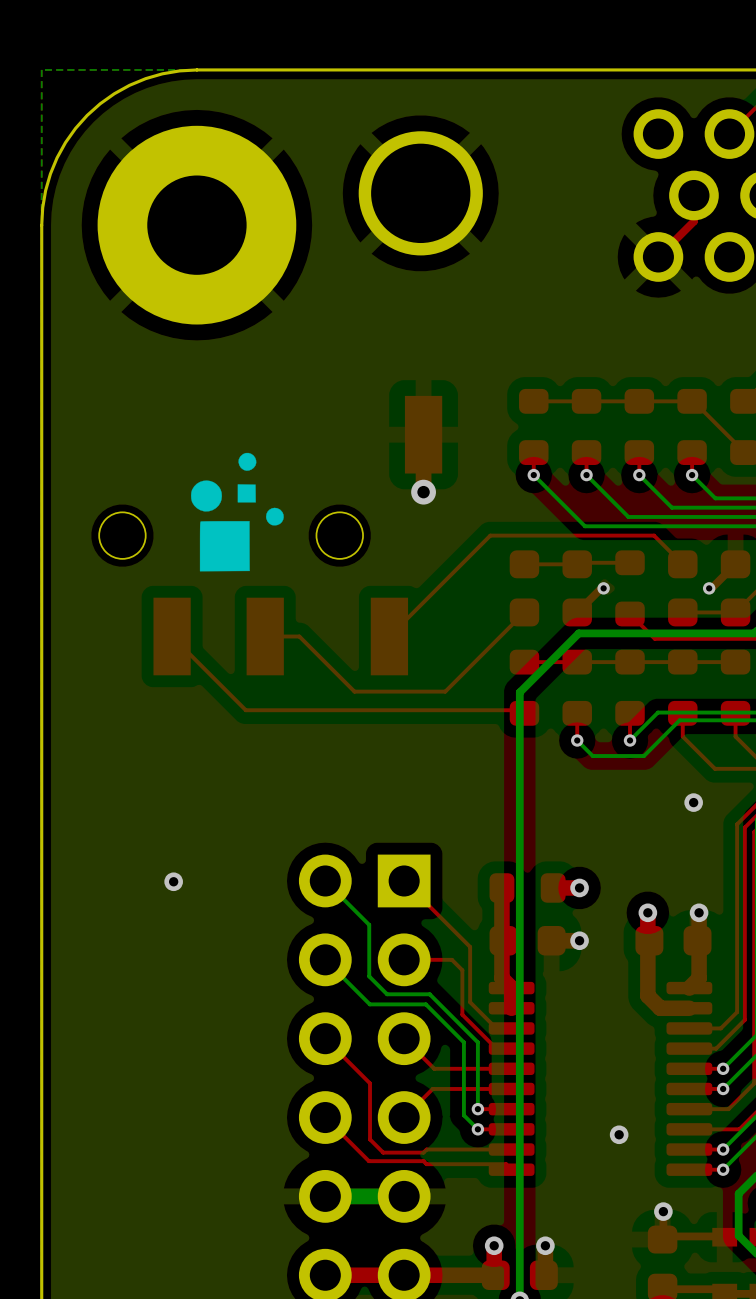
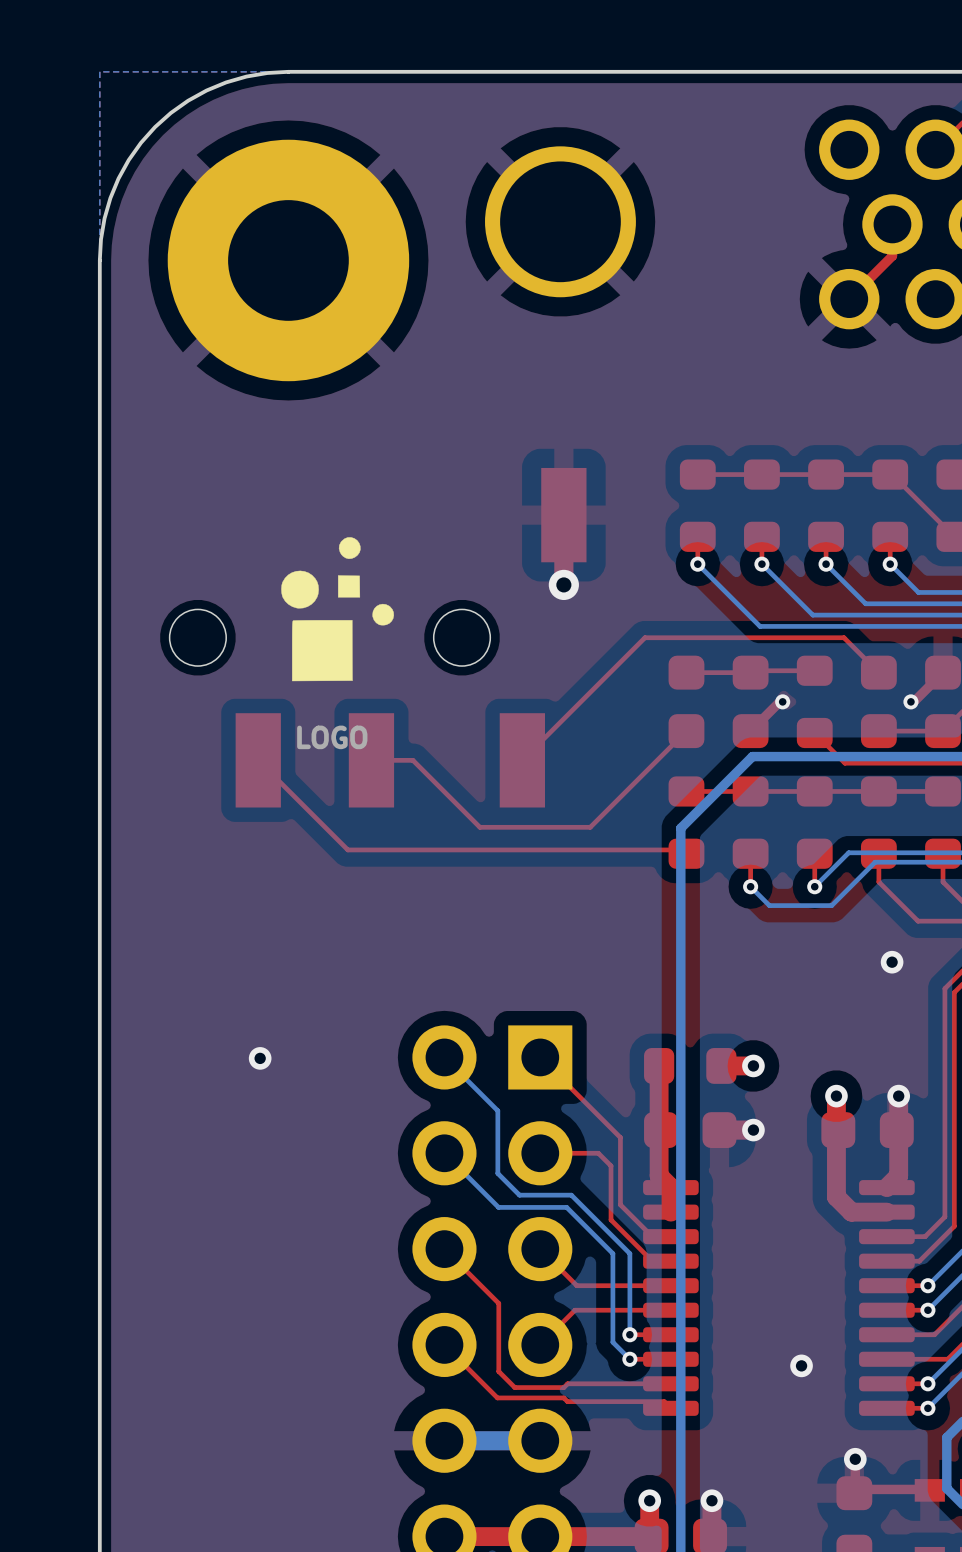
drawing shape: [190, 452, 284, 572] -> [281, 537, 395, 750]

